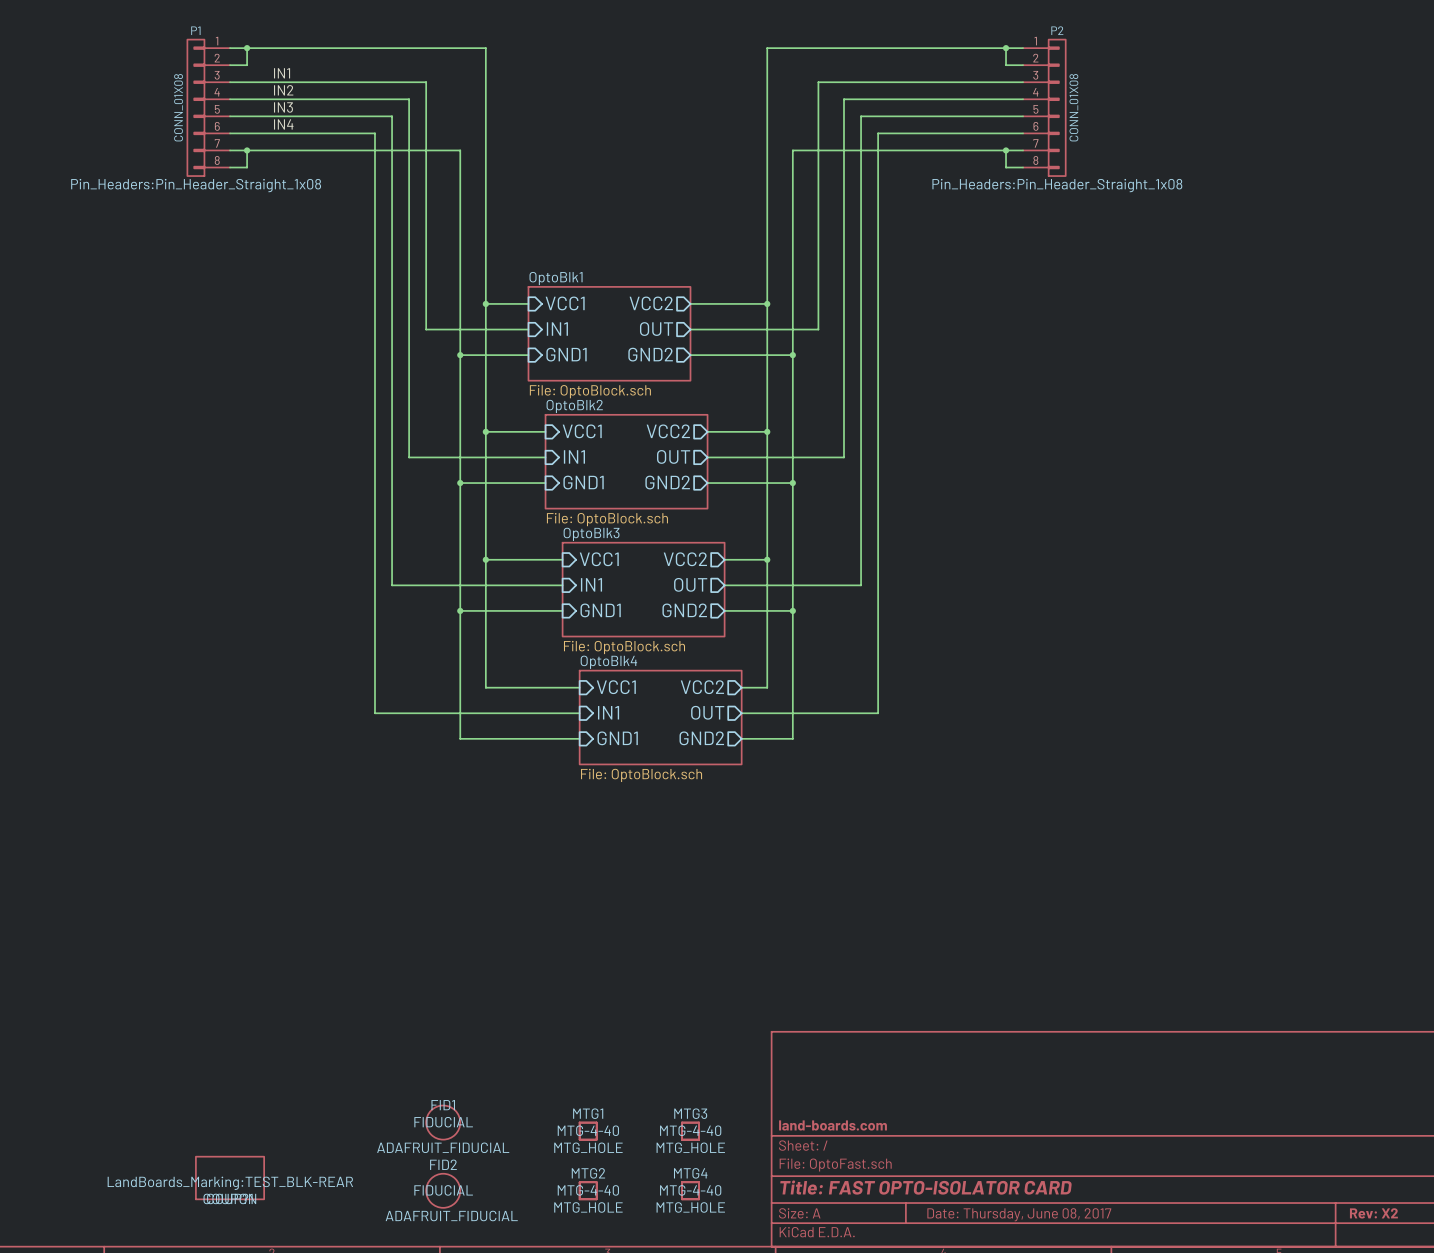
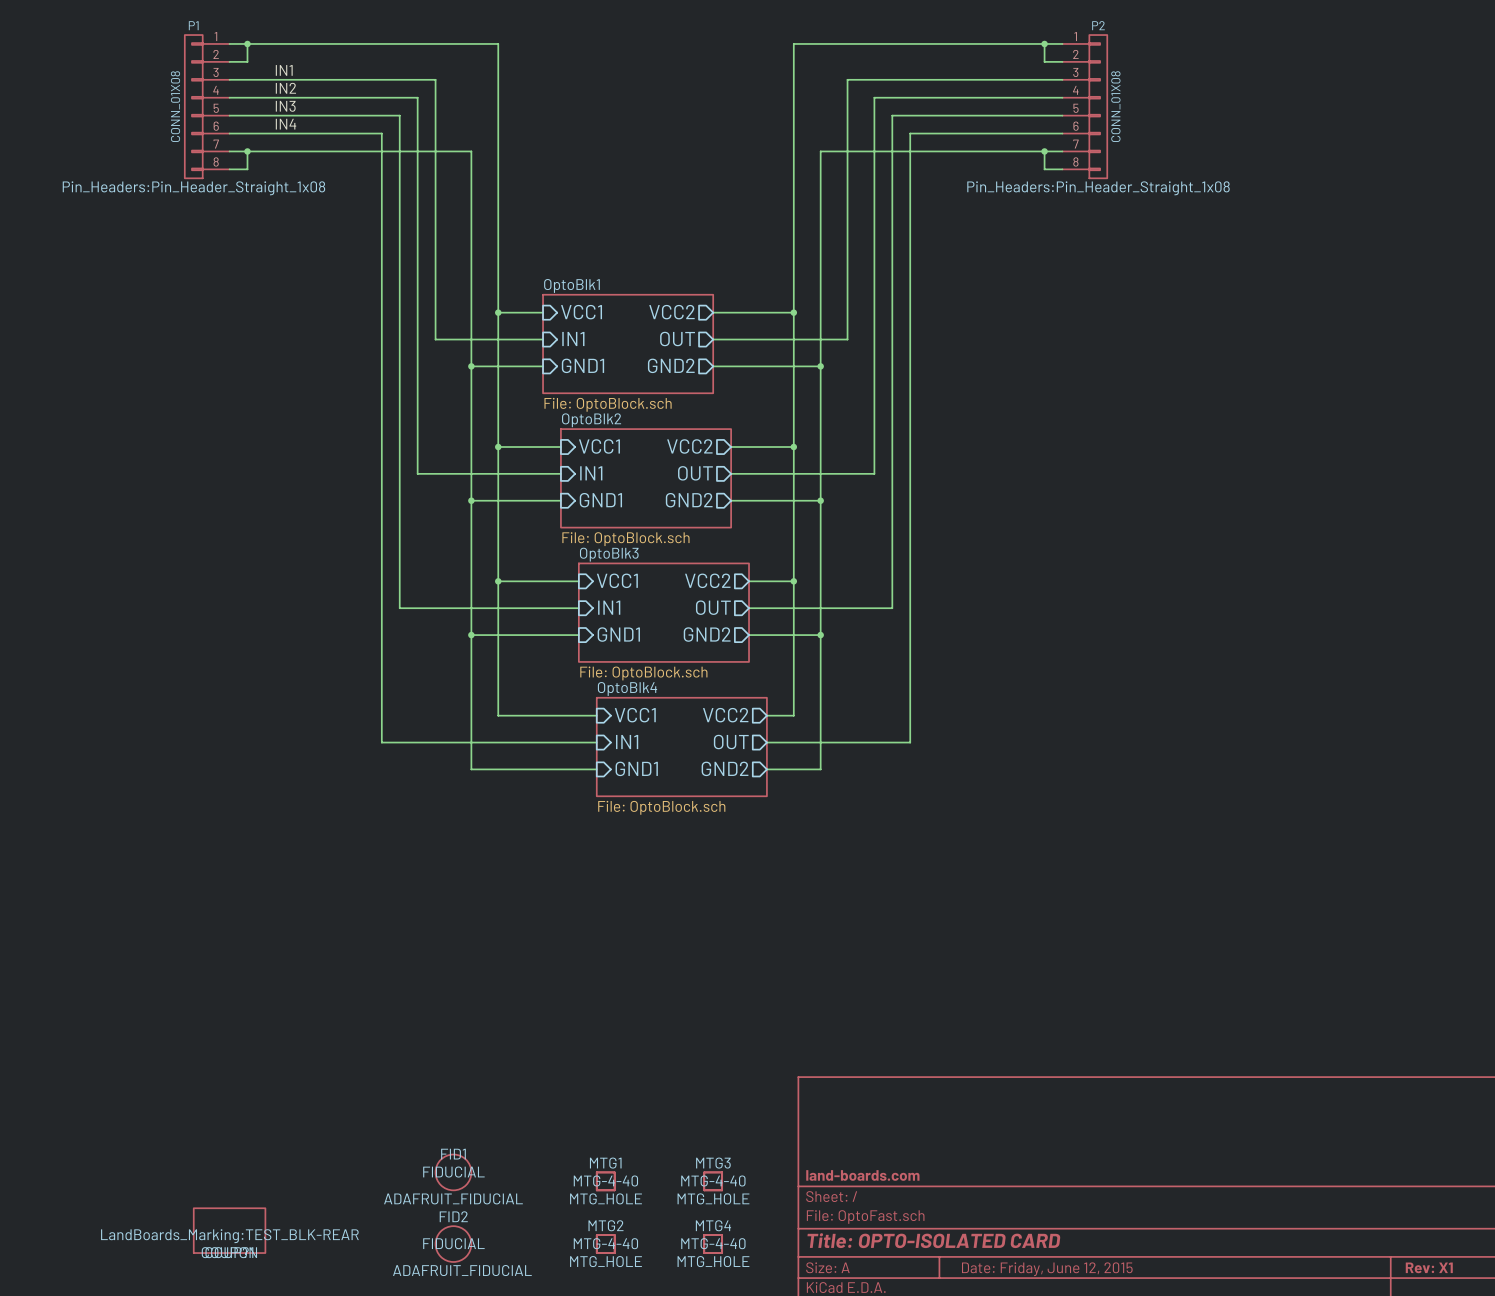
title block: Title: FAST OPTO-ISOLATOR CARD (926, 1187) -> Title: OPTO-ISOLATED CARD (933, 1240)
title block: Rev: X2 (1373, 1213) -> Rev: X1 (1429, 1267)
title block: Date: Thursday, June 08, 2017 (1019, 1214) -> Date: Friday, June 12, 2015 (1047, 1269)

